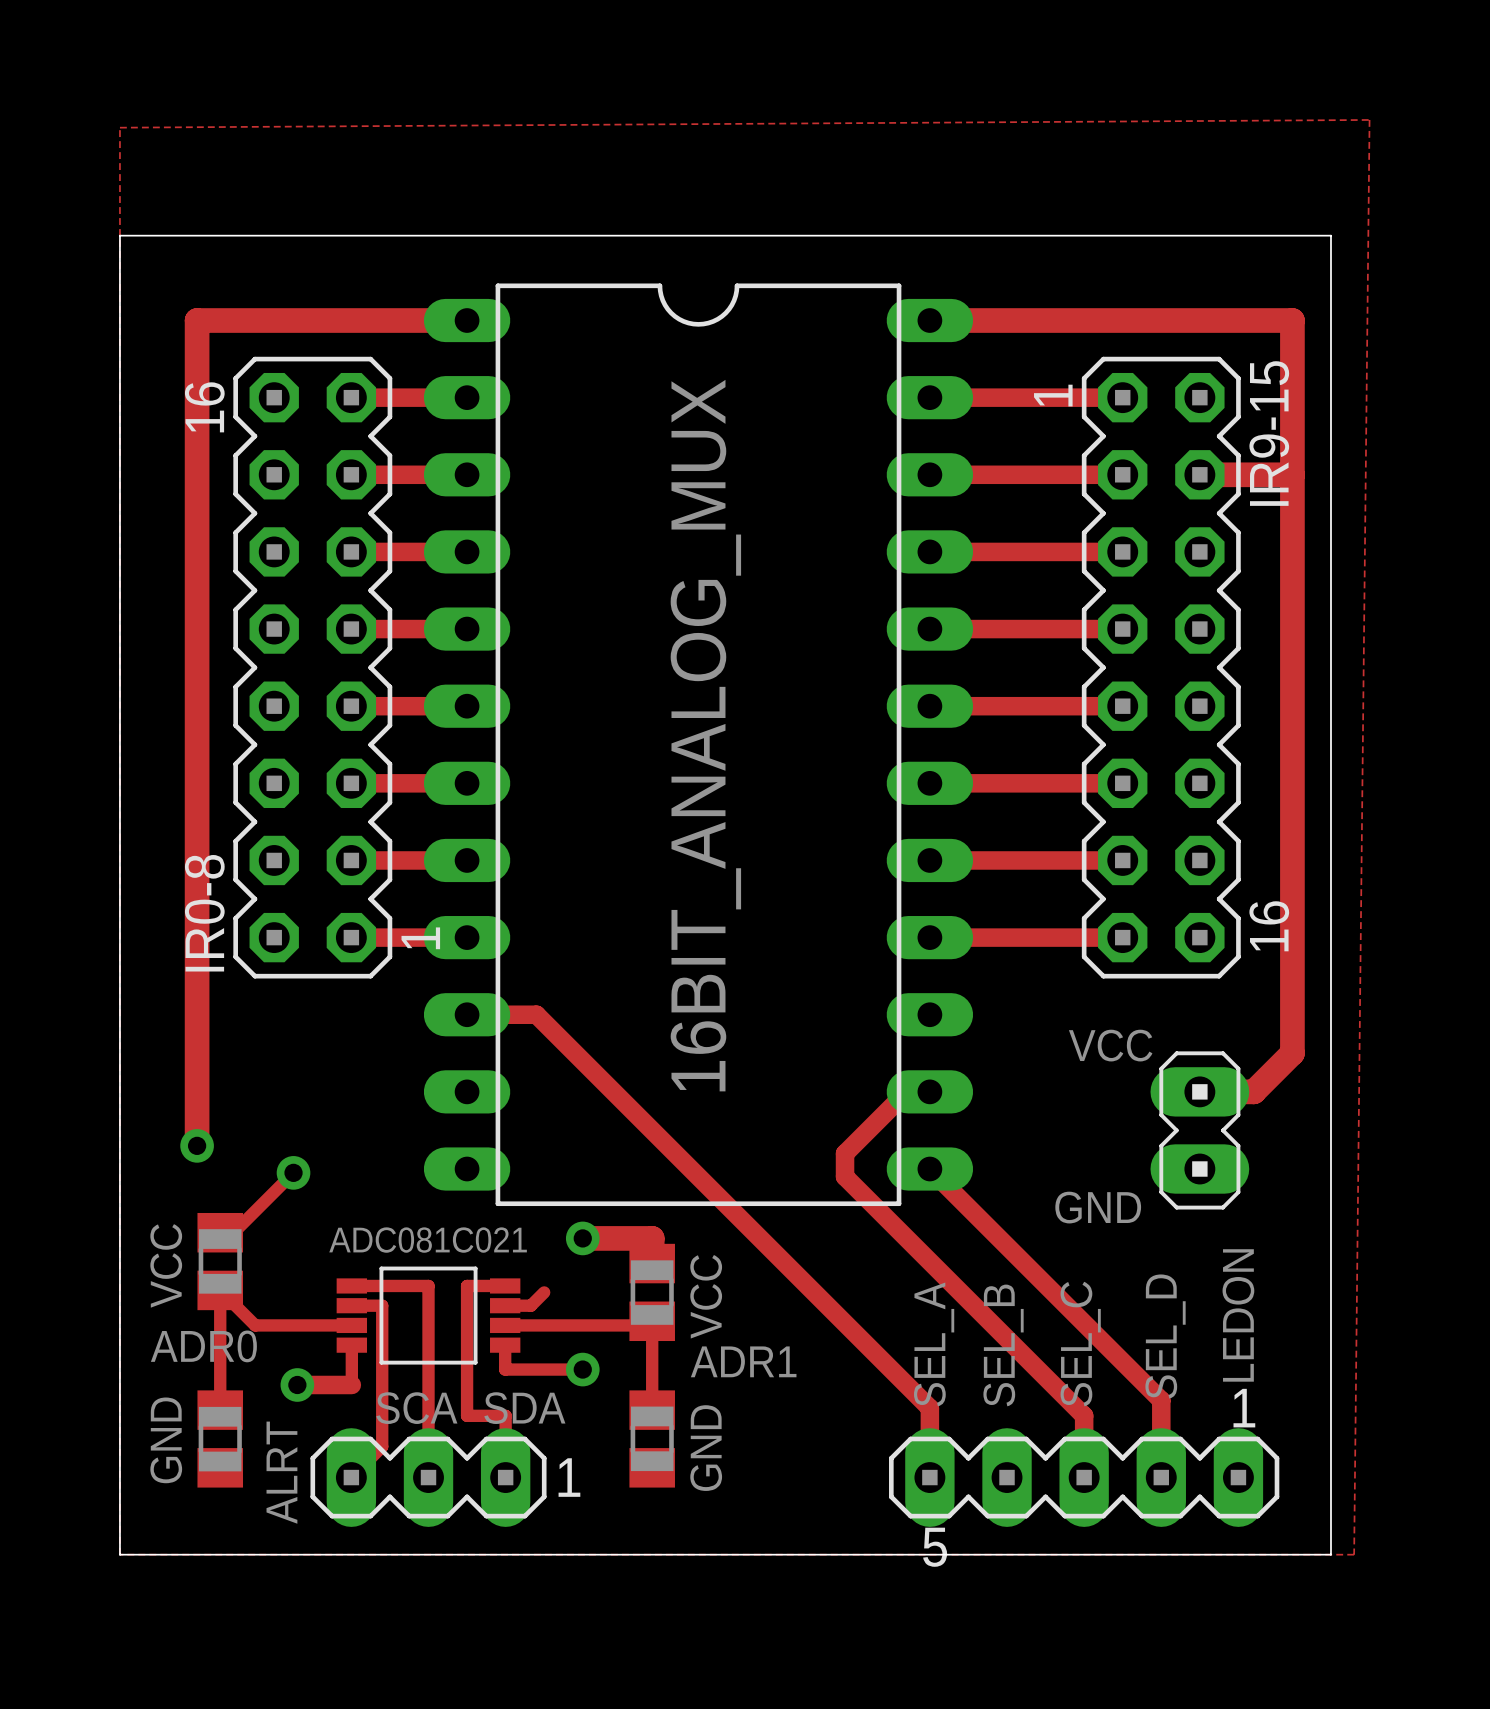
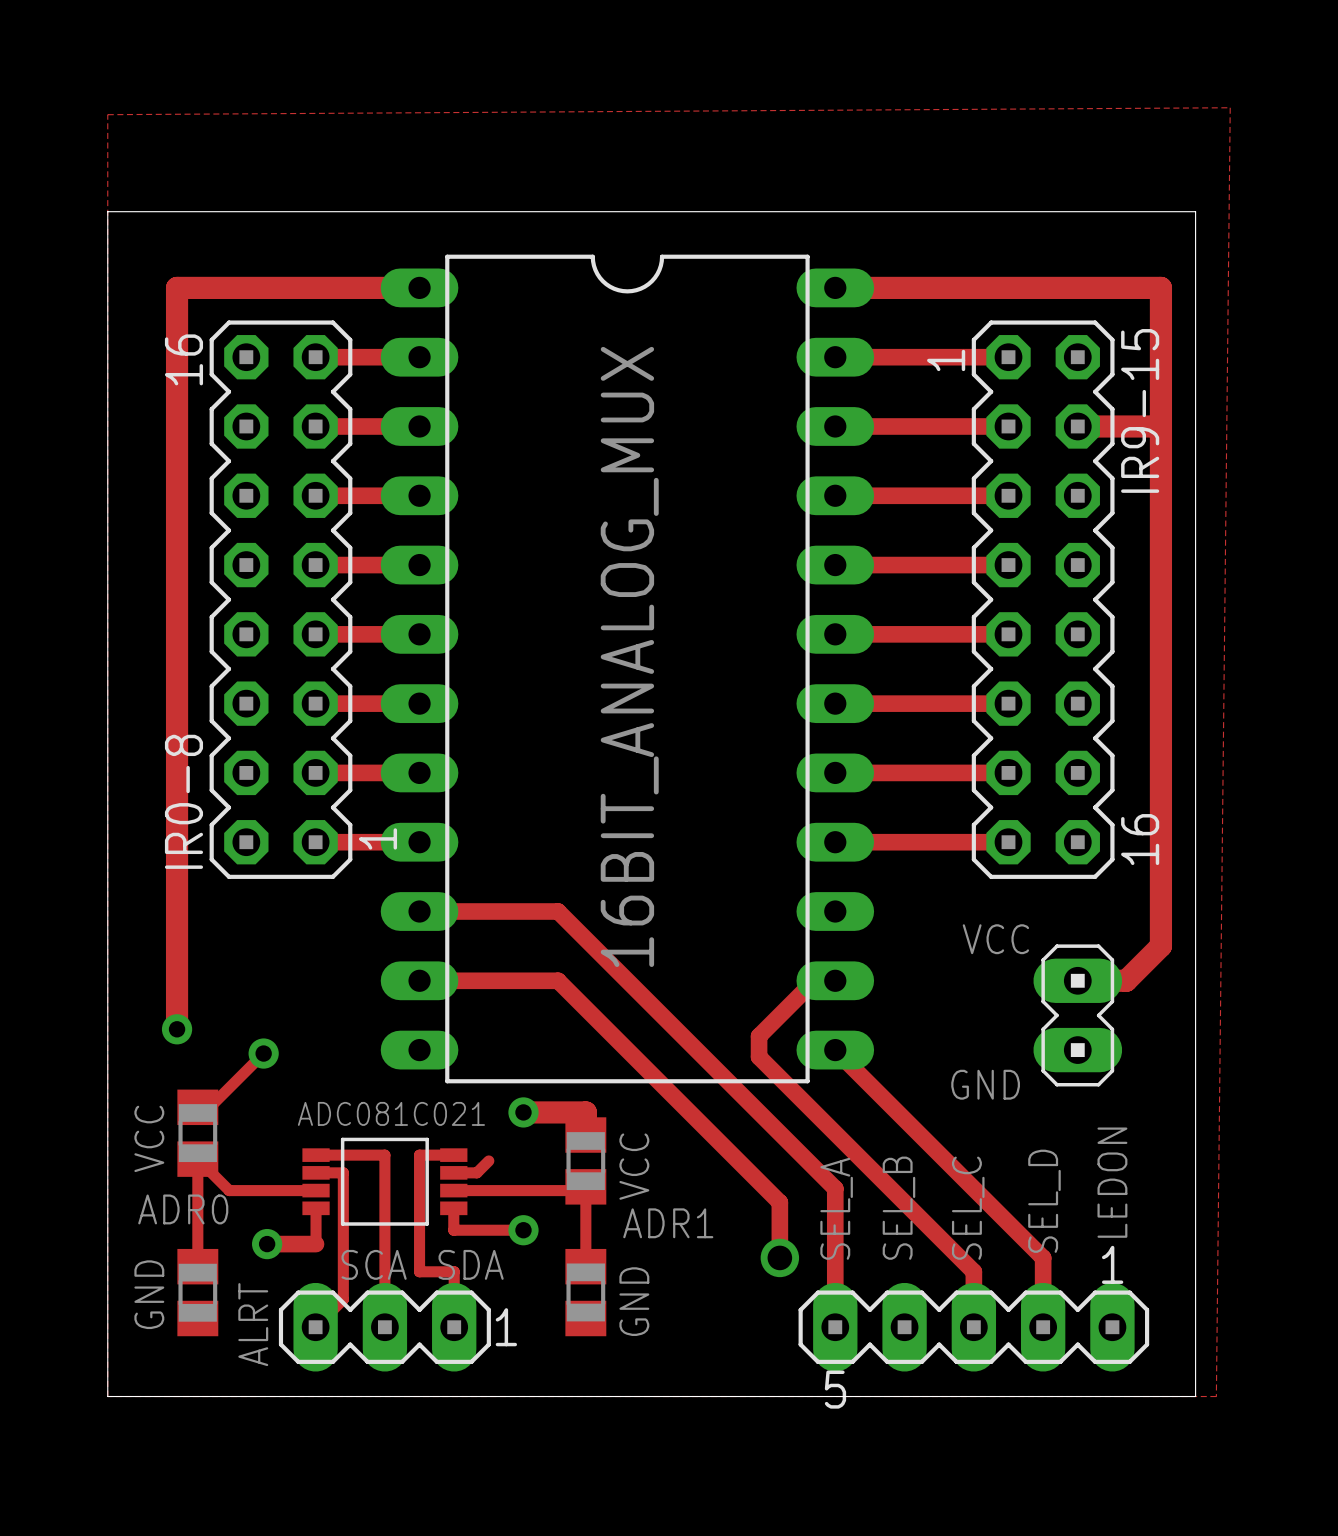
track: (536, 1014) (929, 1408) -> (481, 911) (558, 911) (835, 1188) (835, 1264)
track: none -> (419, 980) (558, 980) (779, 1202) (779, 1257)
via: none -> (779, 1257)

